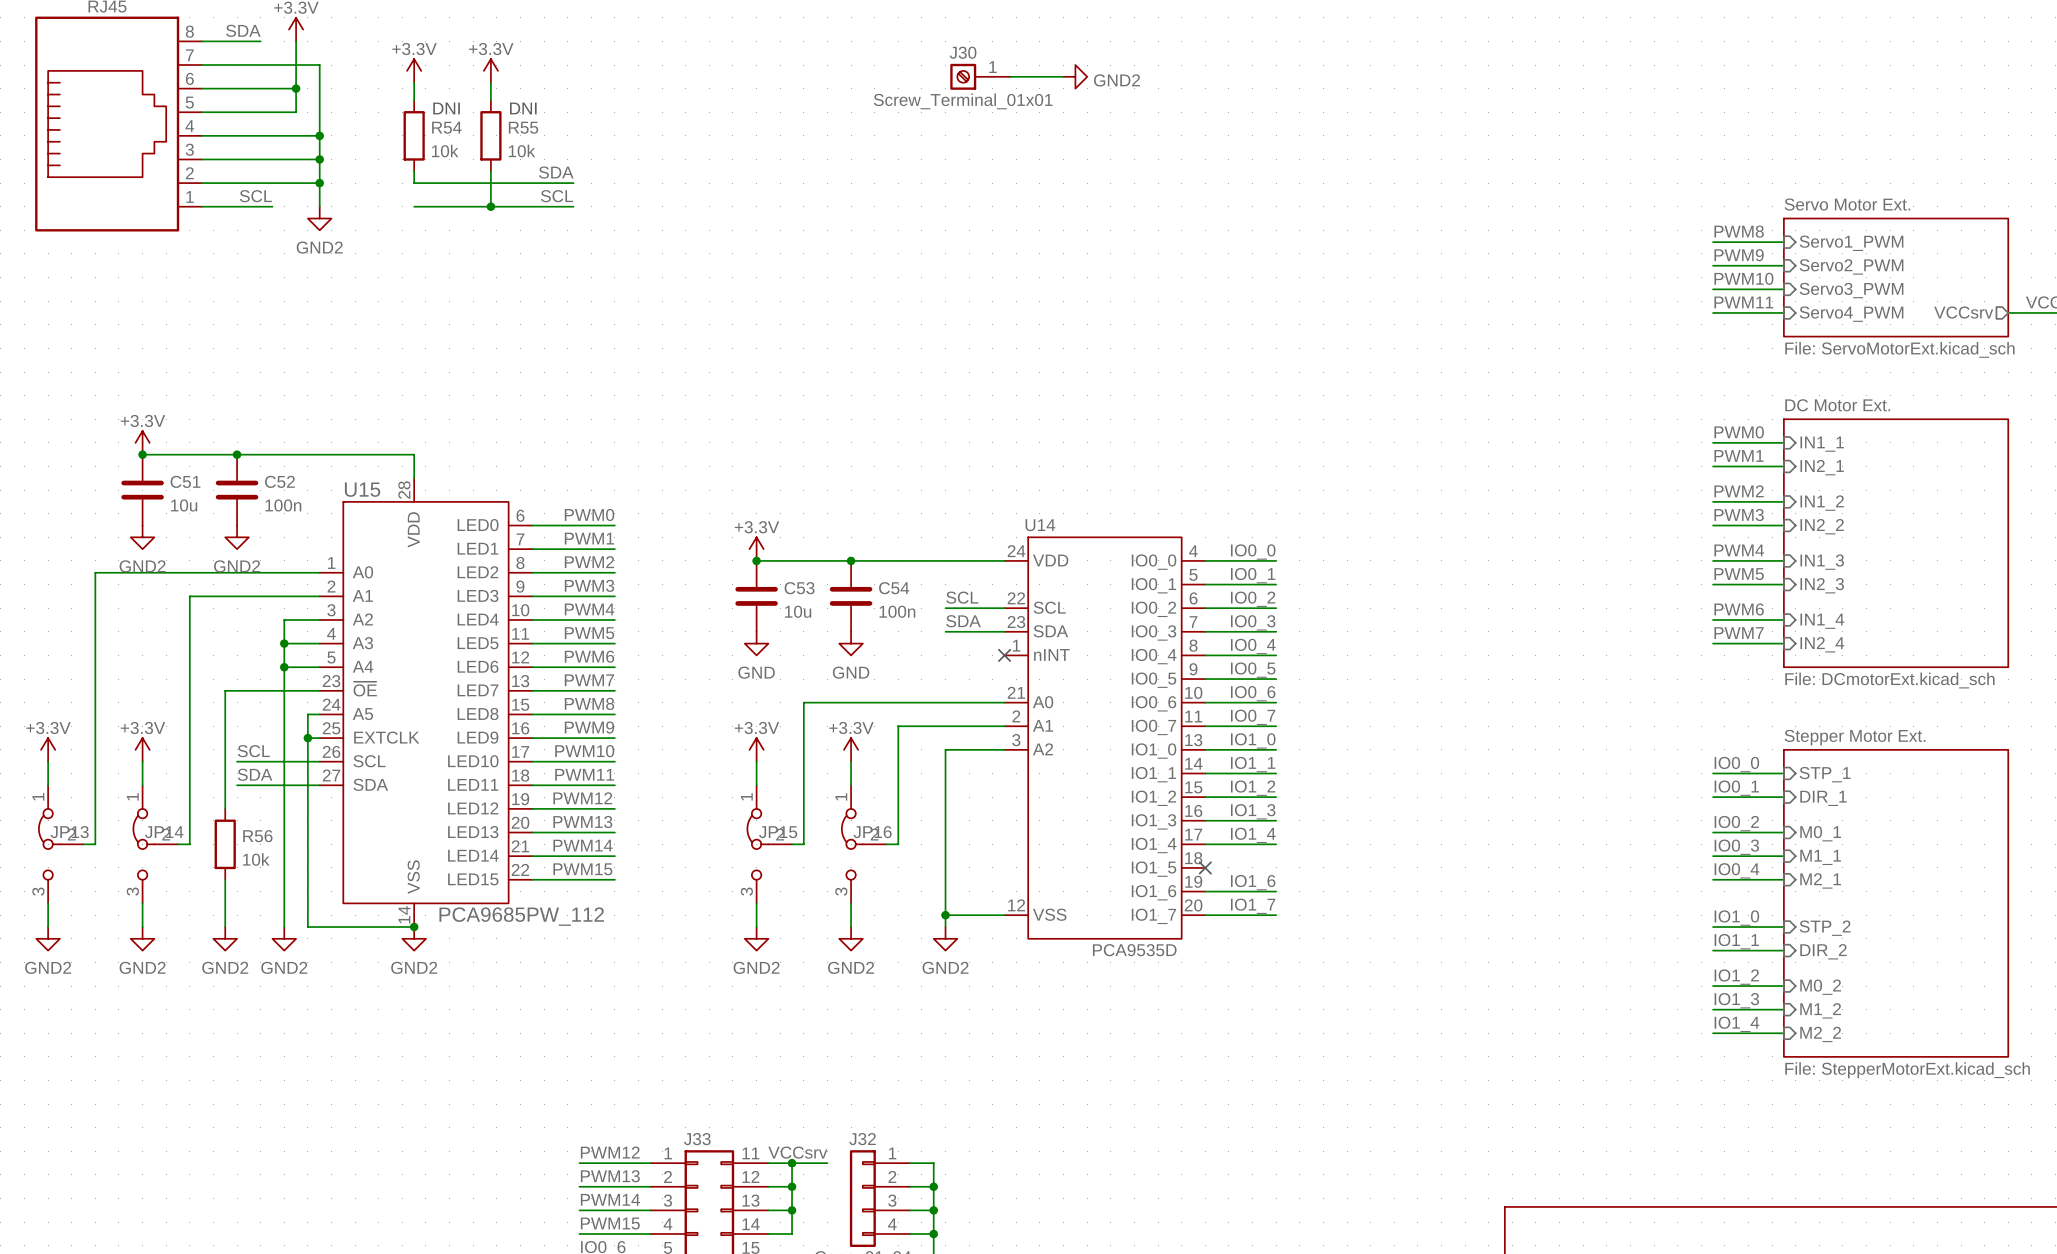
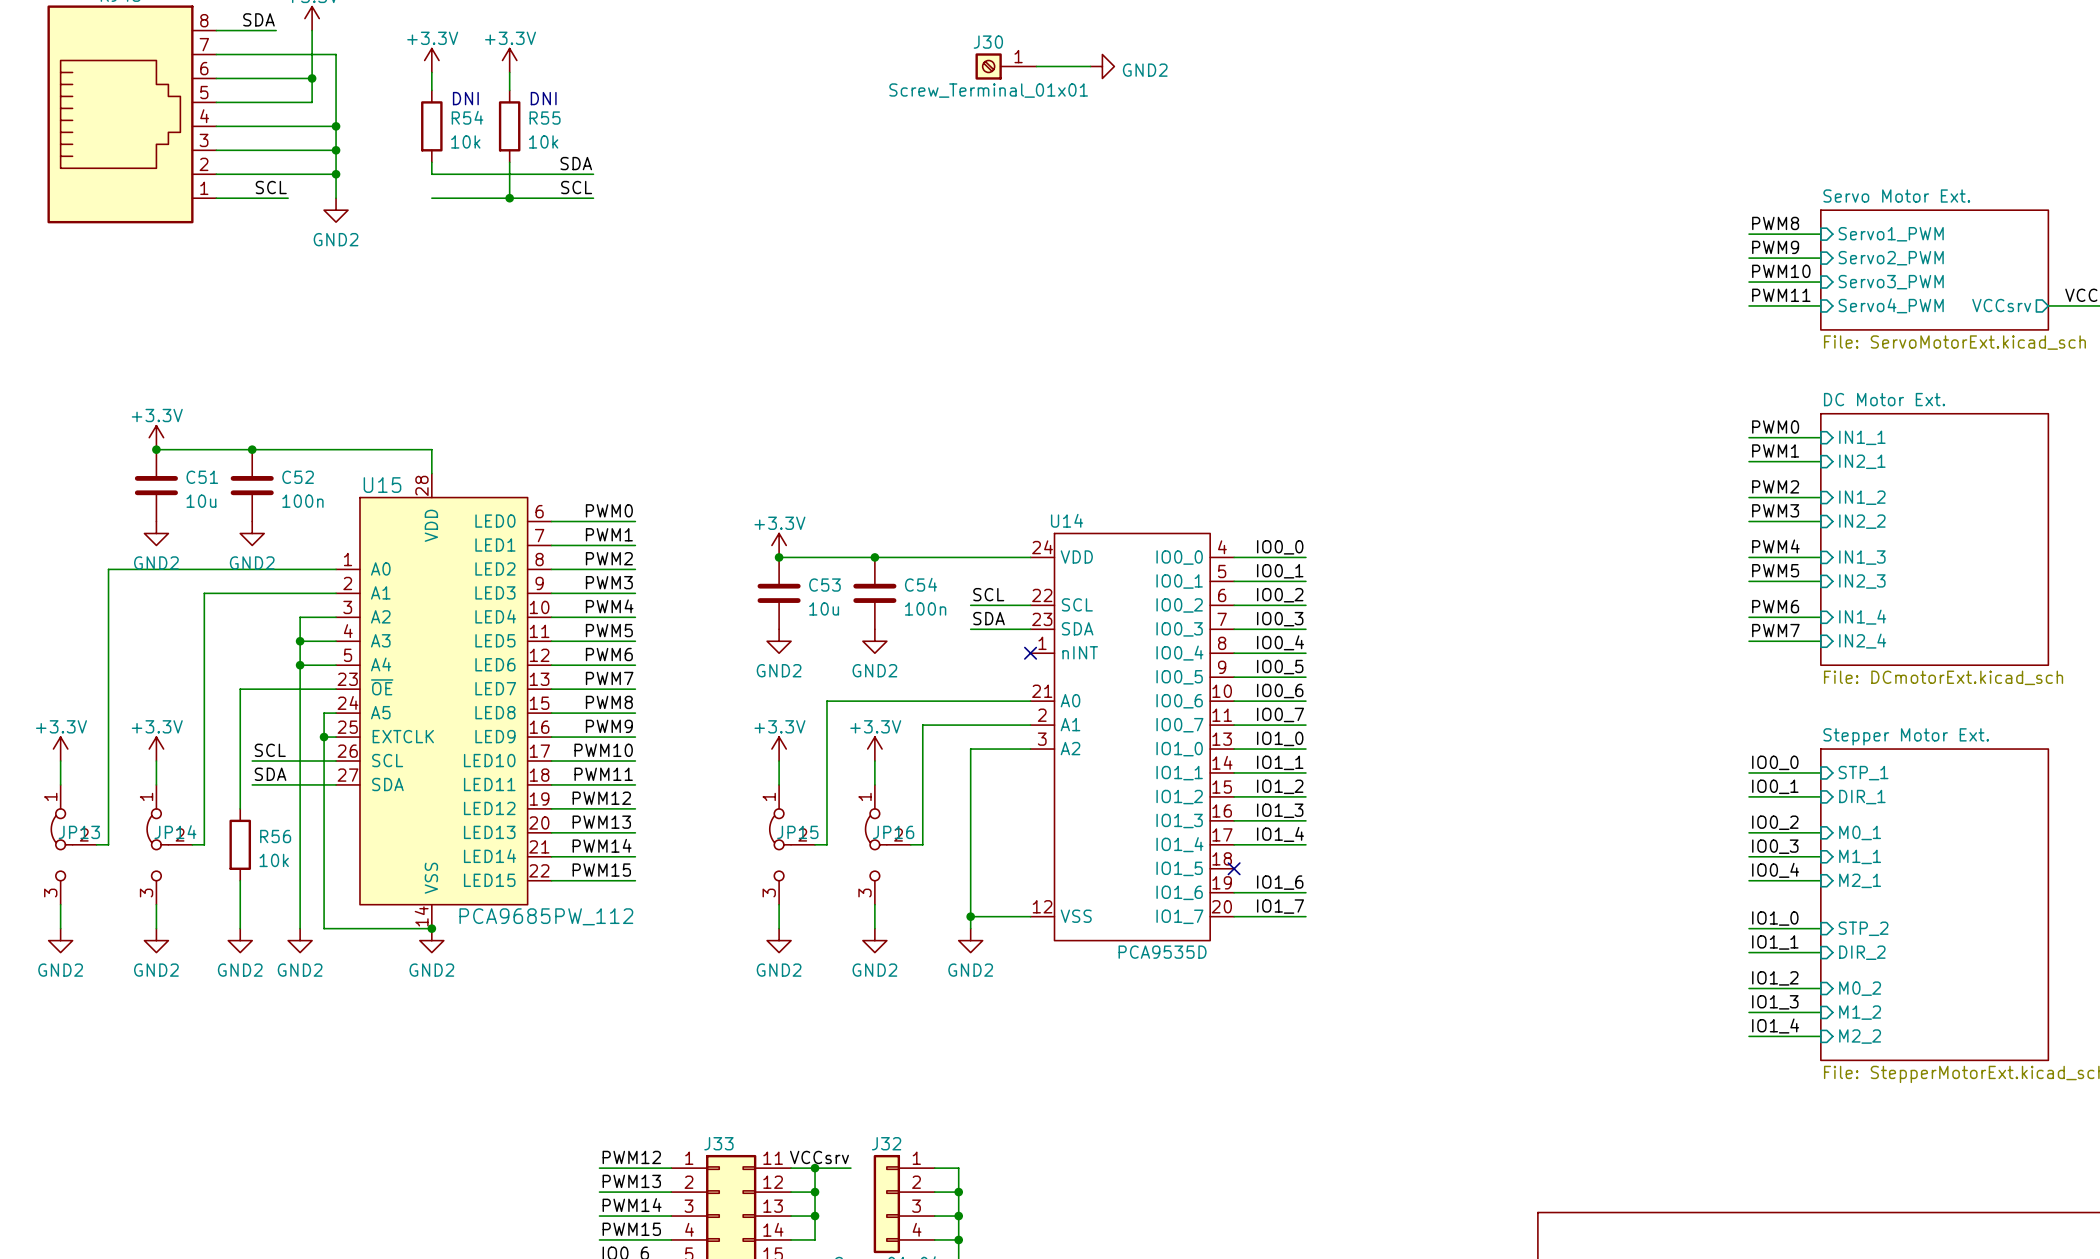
power symbol: GND (756, 643) -> GND2 (779, 641)
power symbol: GND (851, 643) -> GND2 (874, 641)

